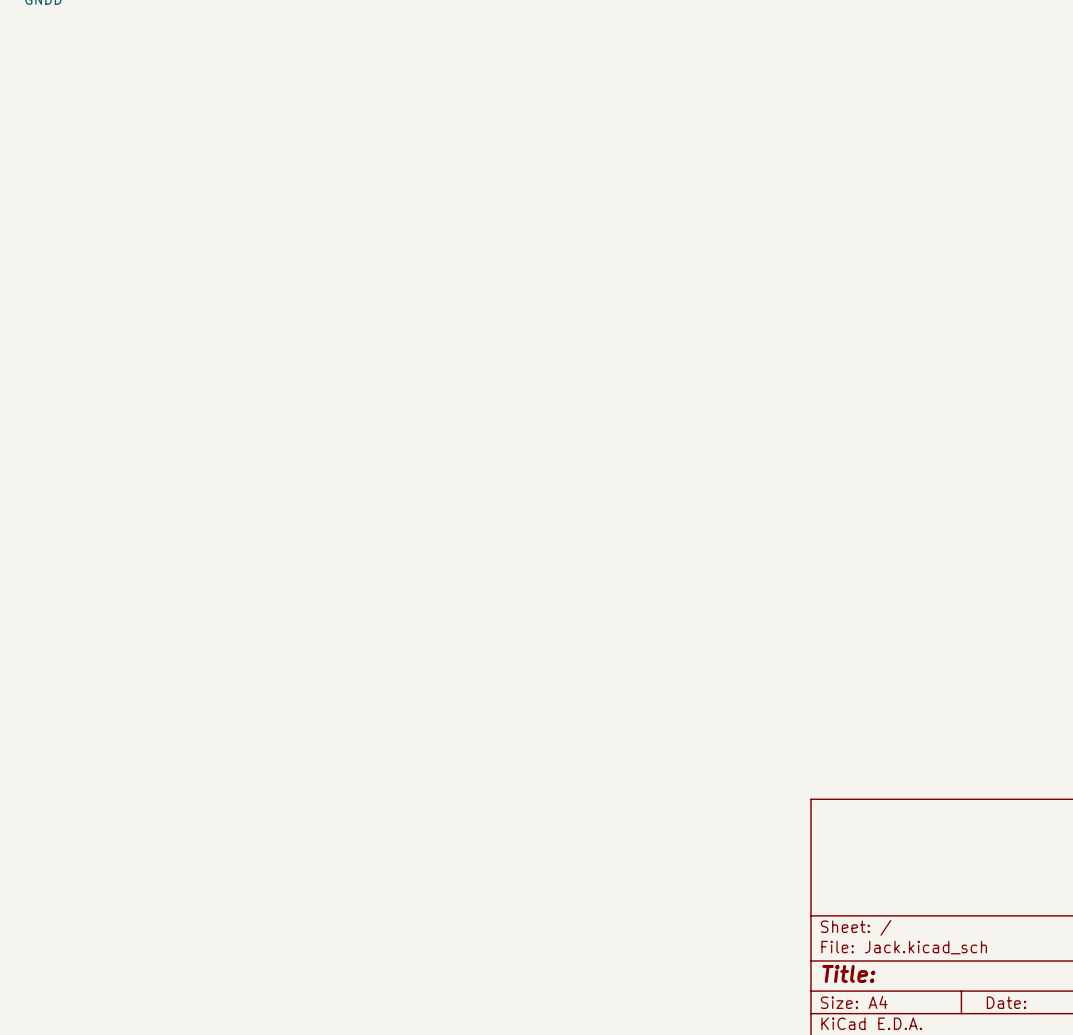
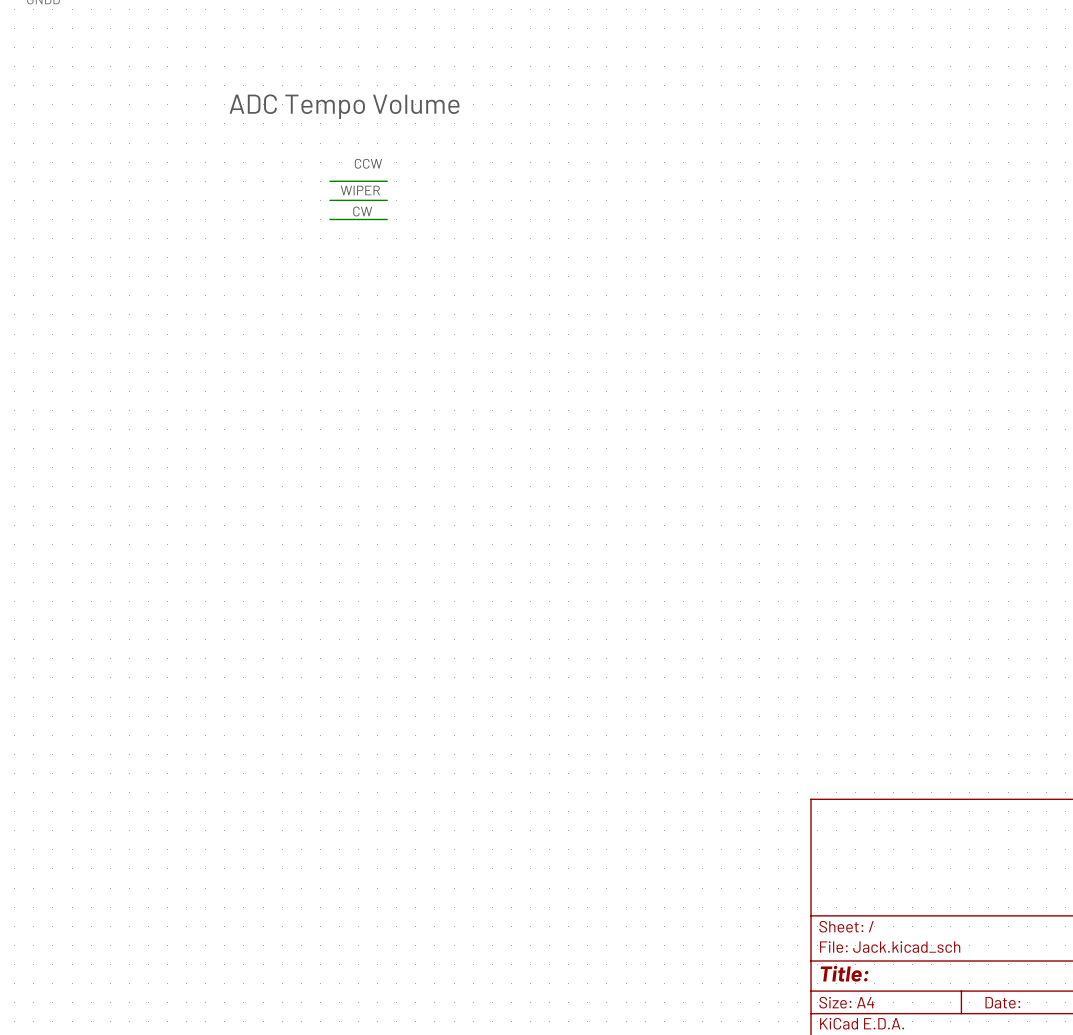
text: none -> ADC Tempo Volume (344, 106)
text: none -> CCW (368, 163)
wire: none -> (329, 181) (387, 181)
text: none -> WIPER (360, 190)
wire: none -> (329, 200) (387, 200)
text: none -> CW (362, 211)
wire: none -> (329, 219) (387, 219)

